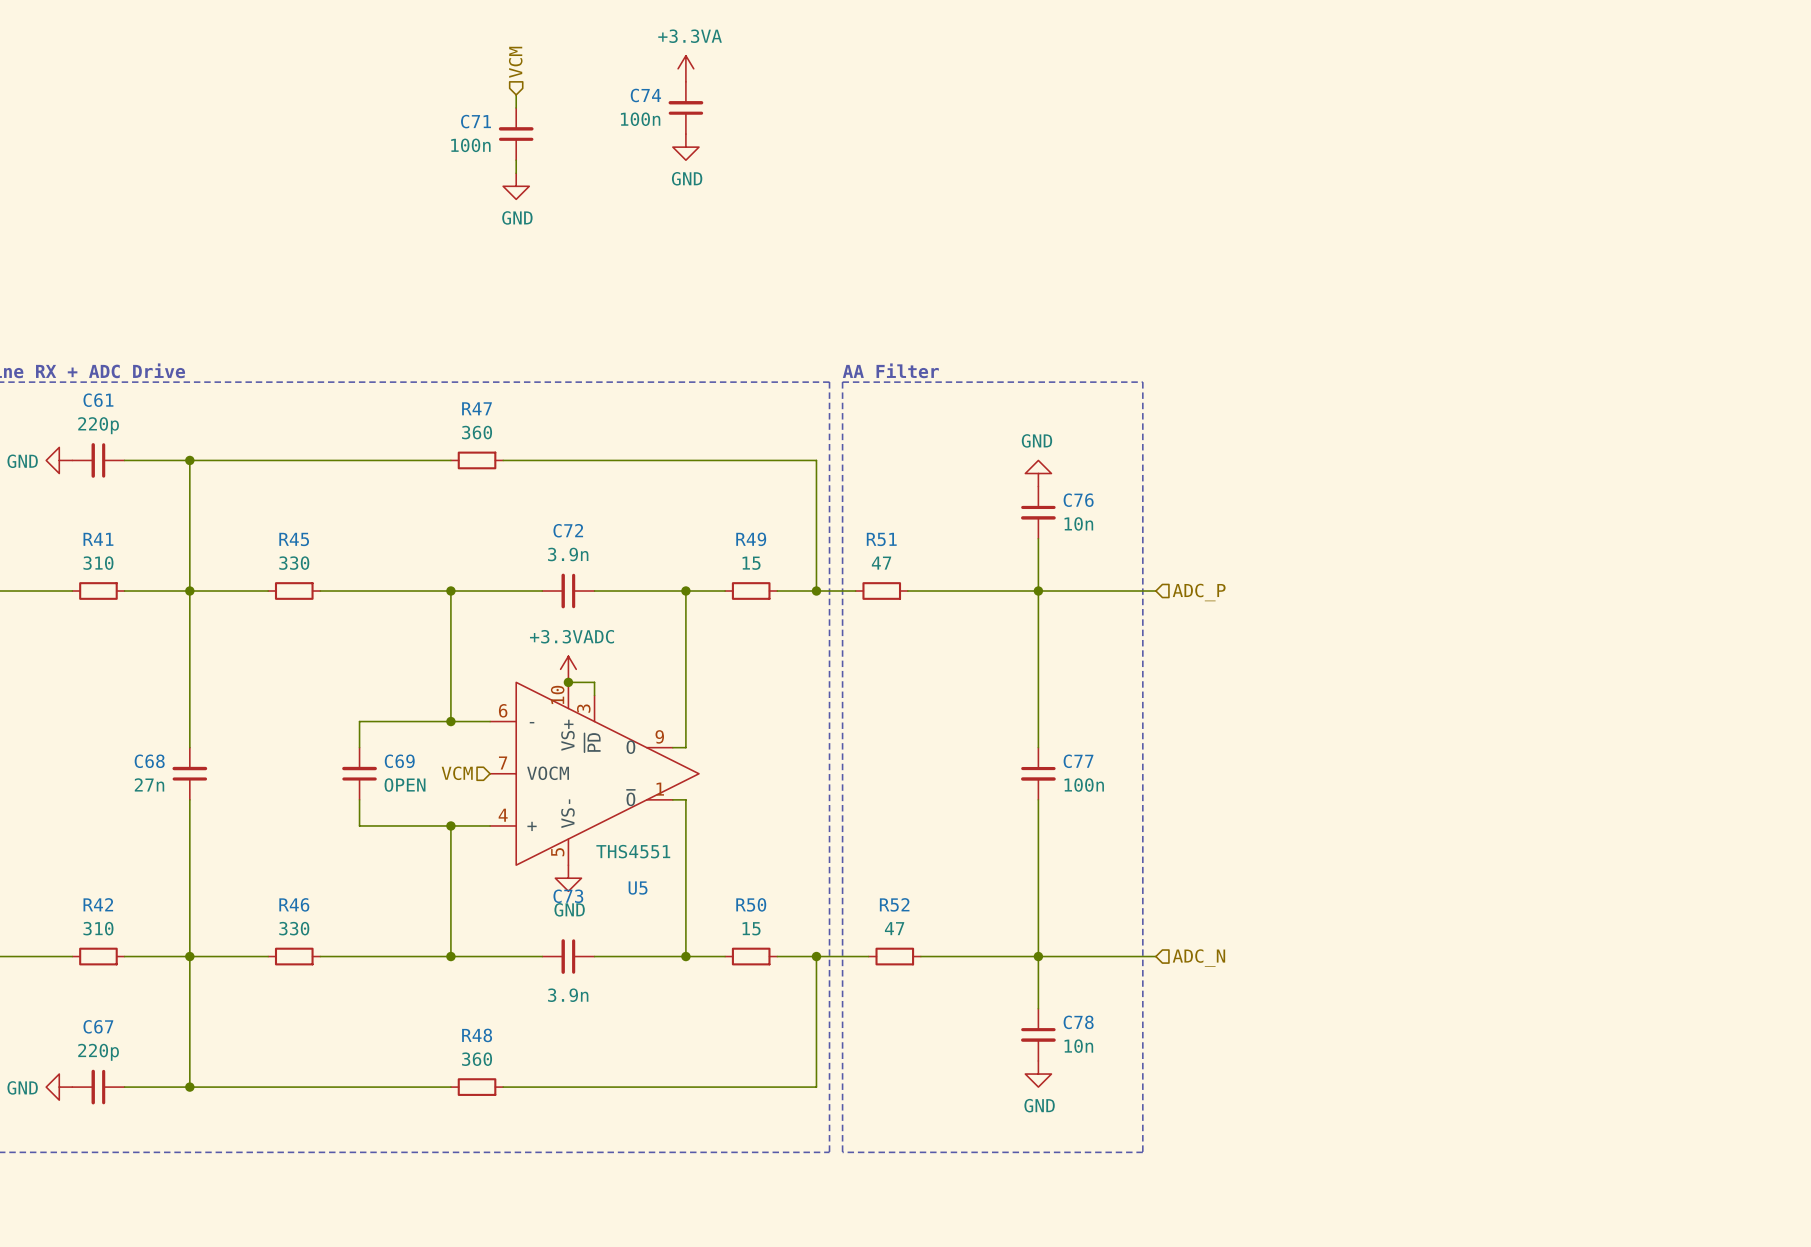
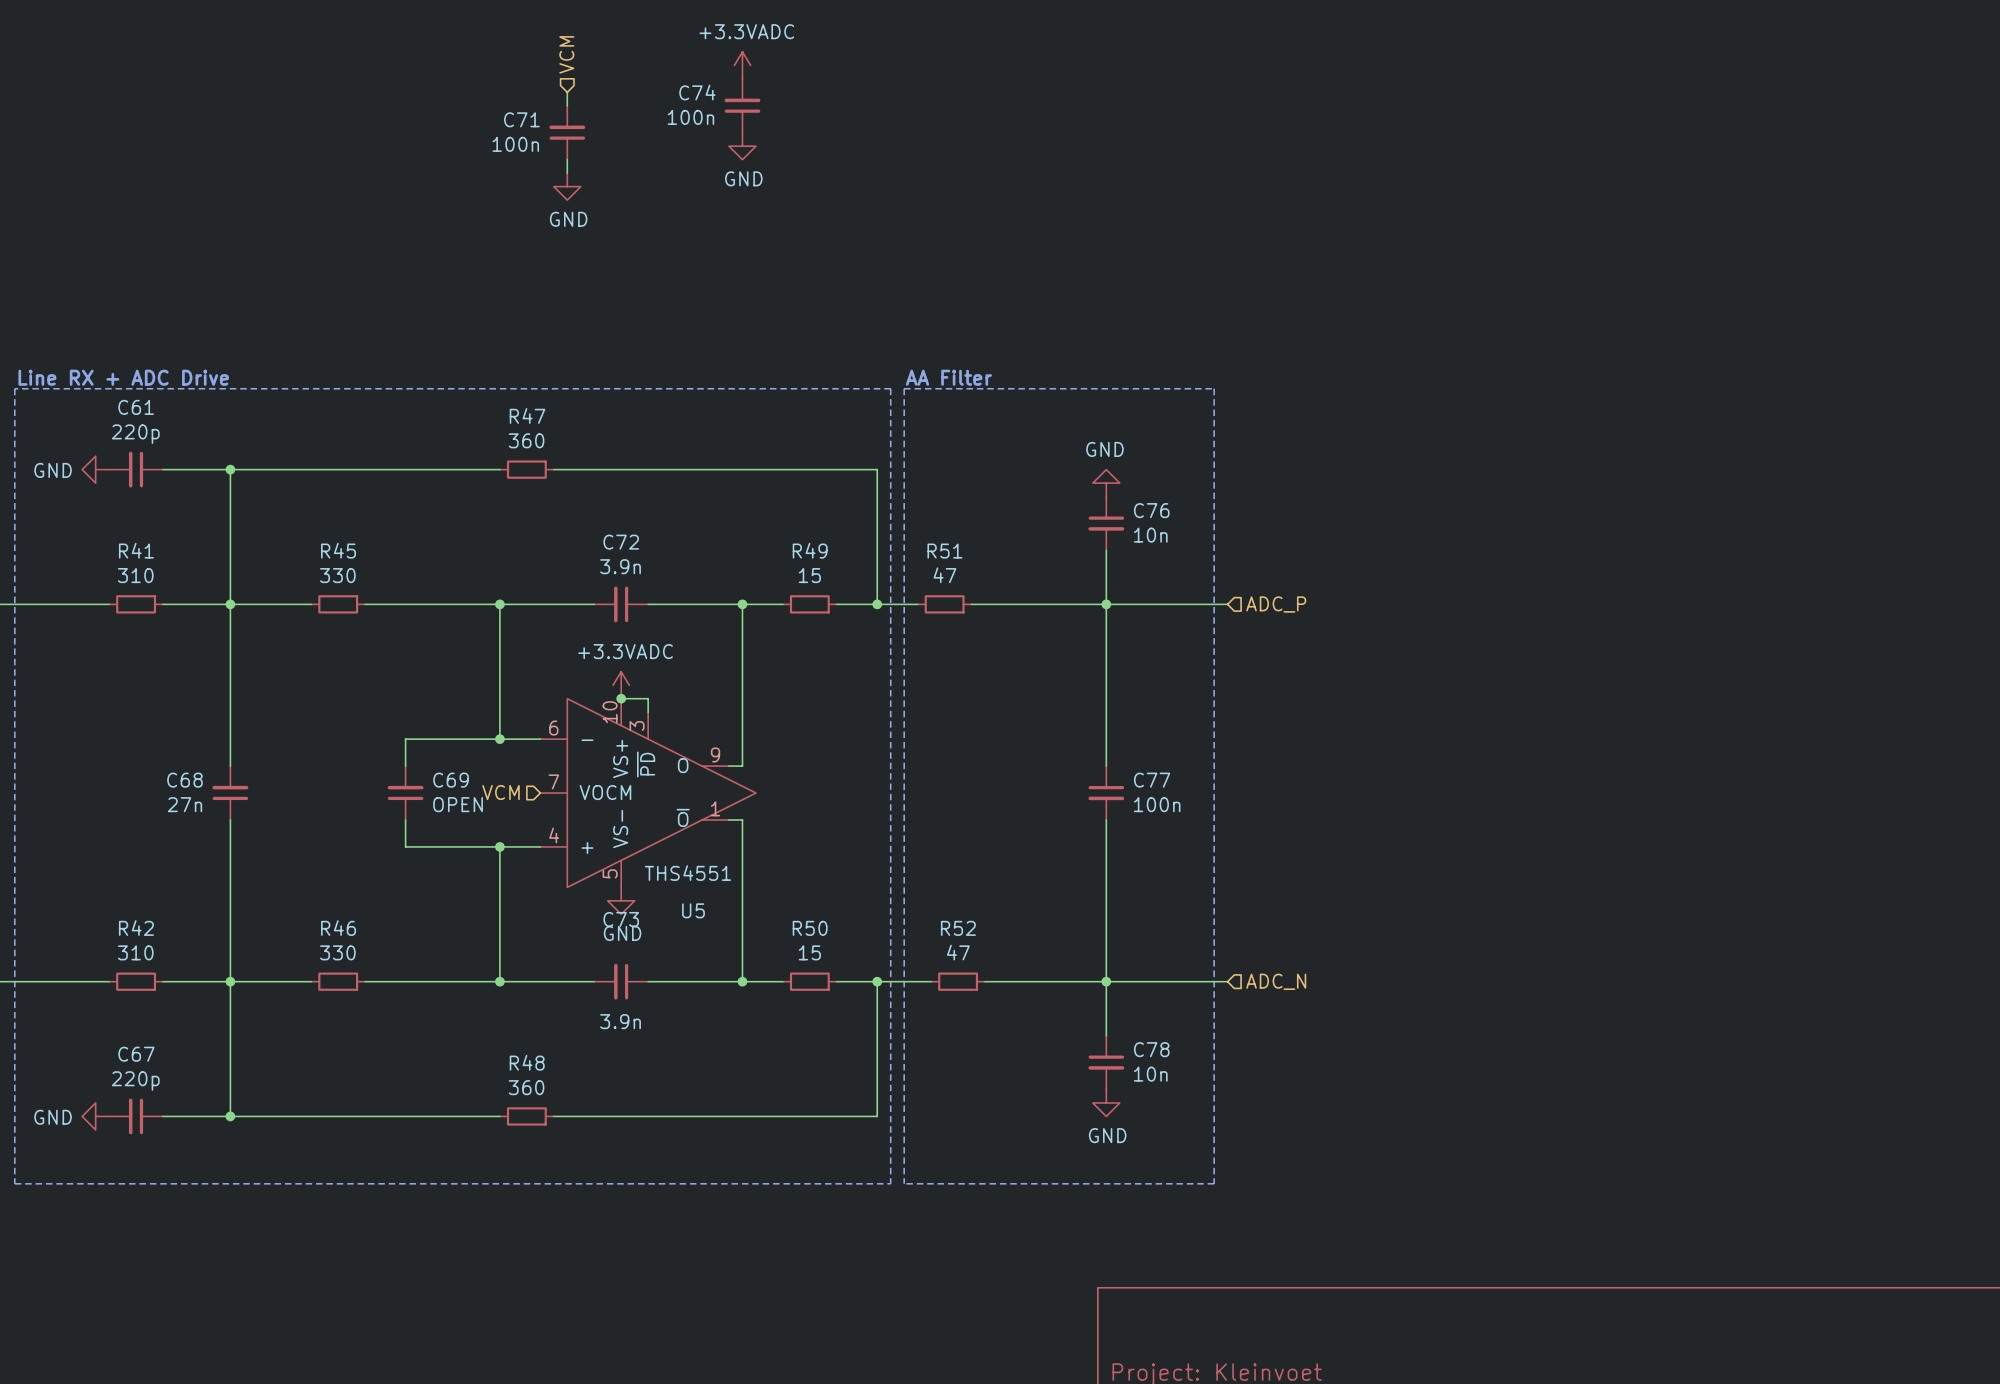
power symbol: +3.3VA (685, 68) -> +3.3VADC (742, 65)

